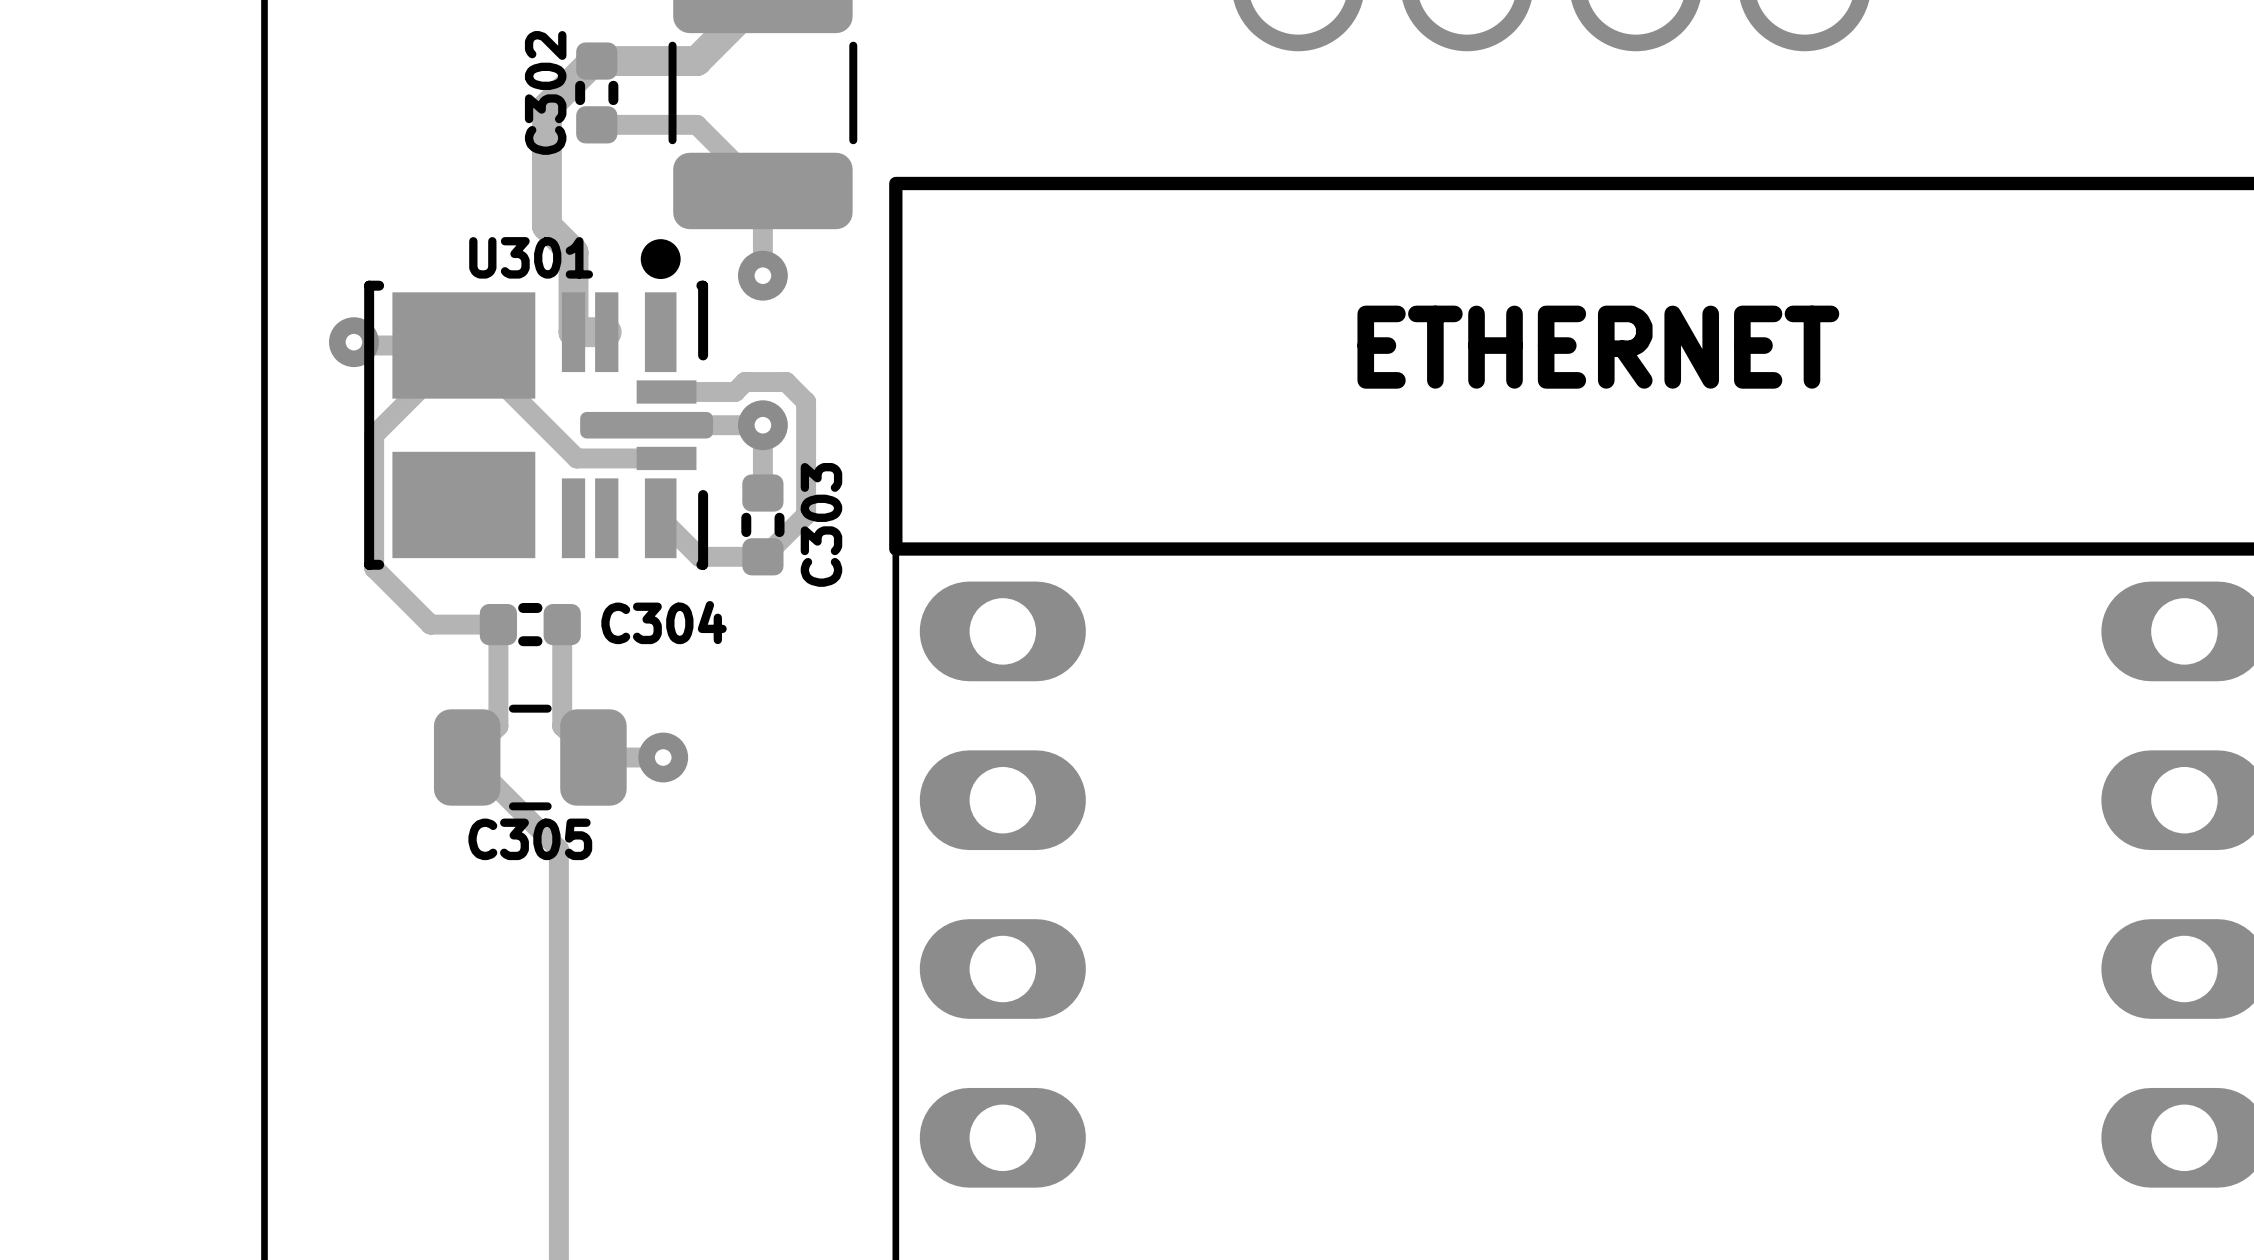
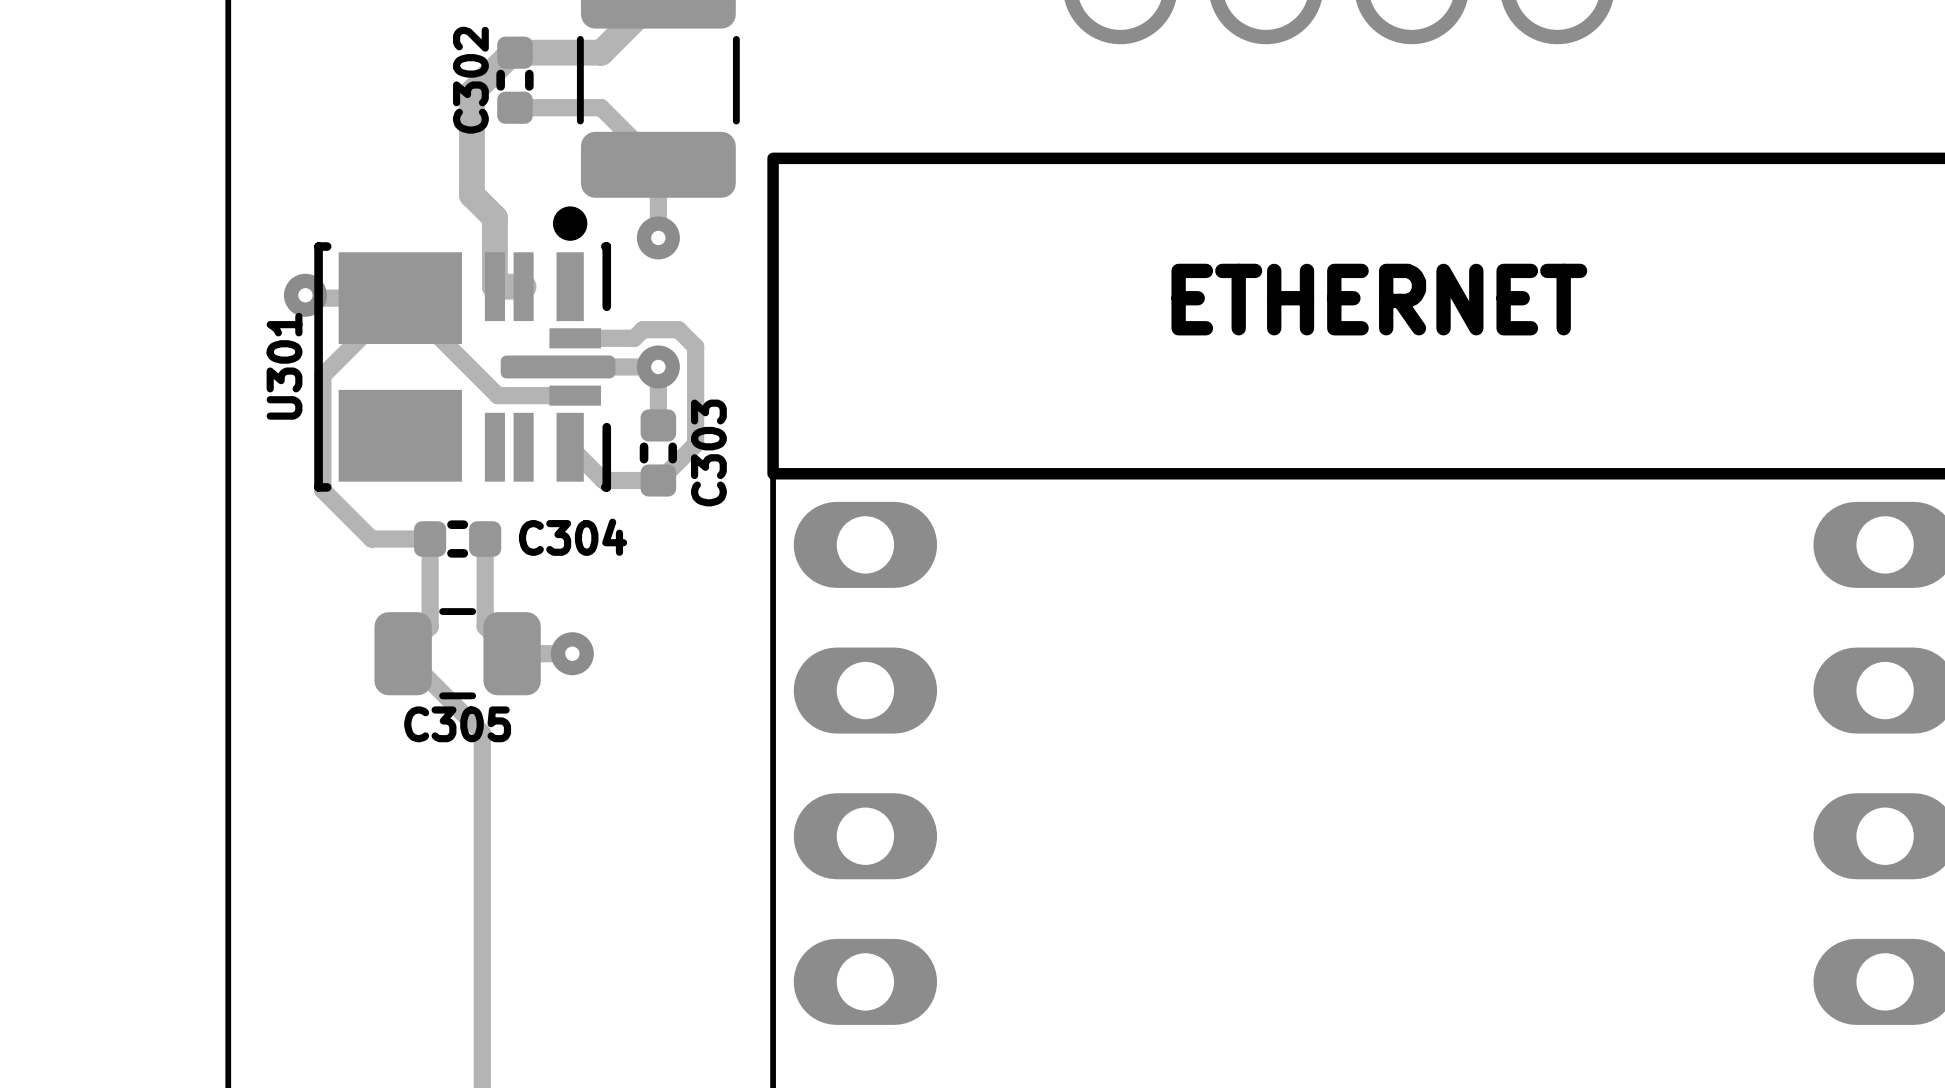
U301 name rotation: 0° (531, 257) -> 90° counterclockwise (284, 366)
U301 name position: U301 (531, 257) -> U301 (284, 366)

